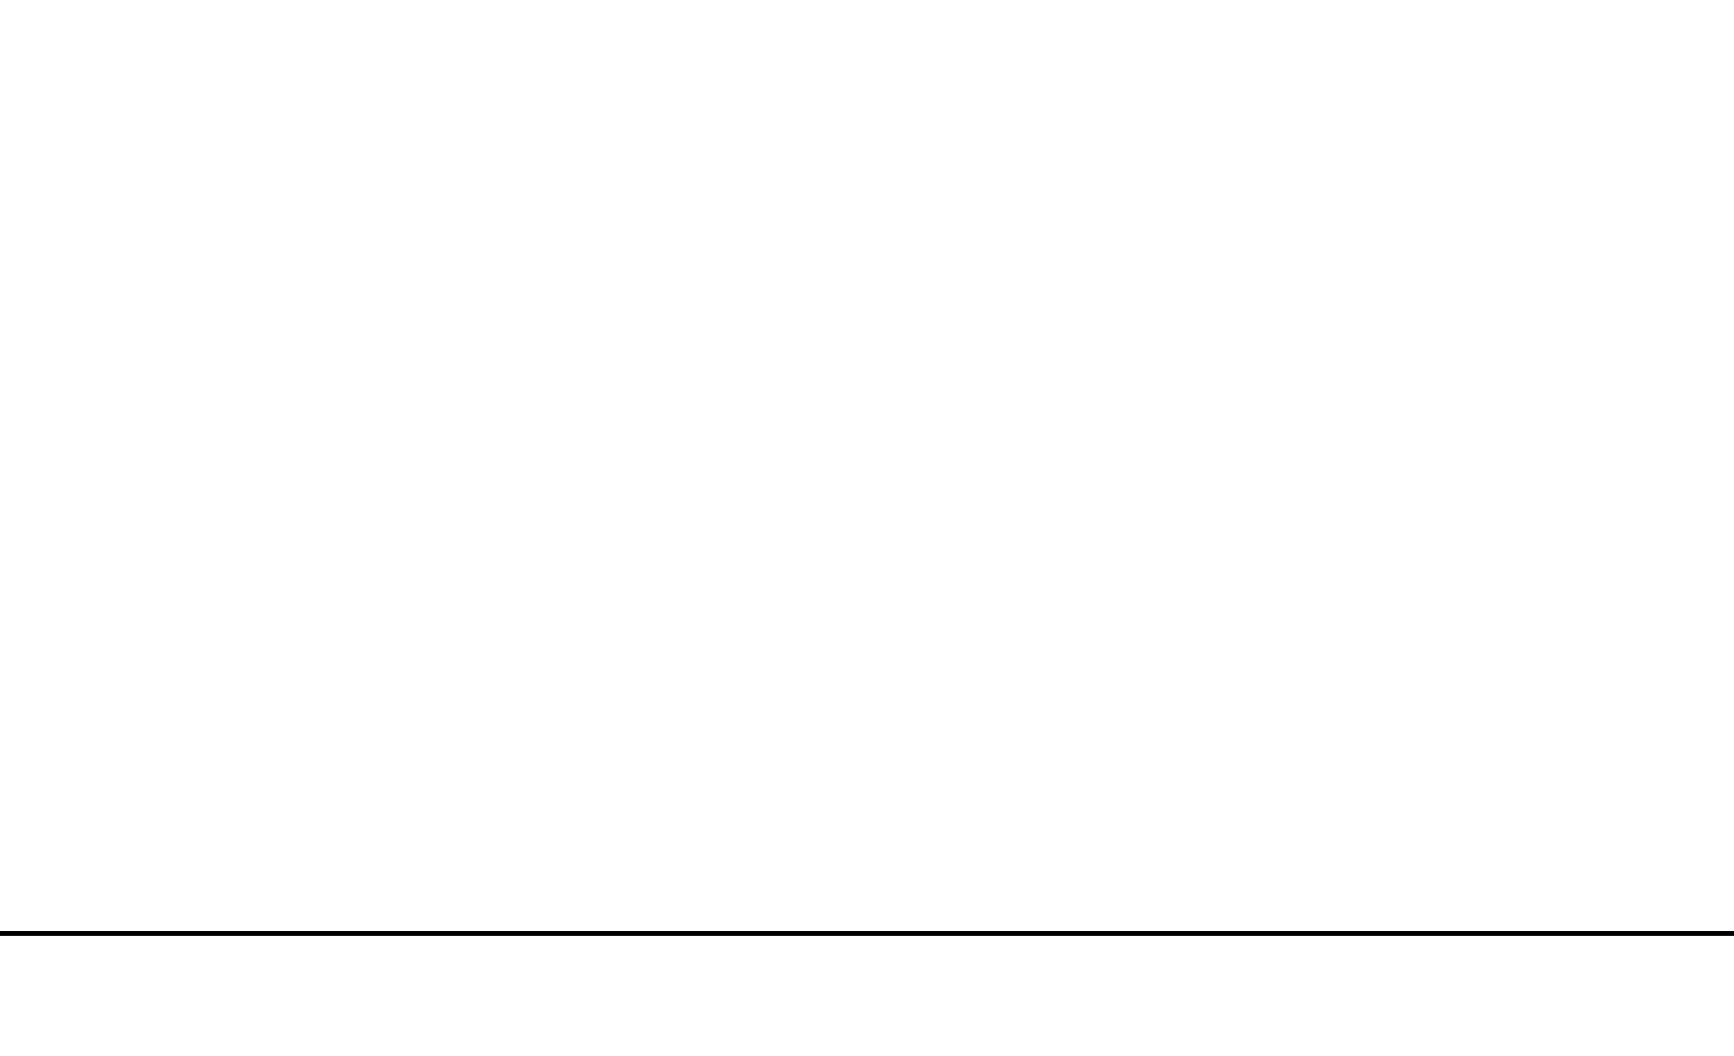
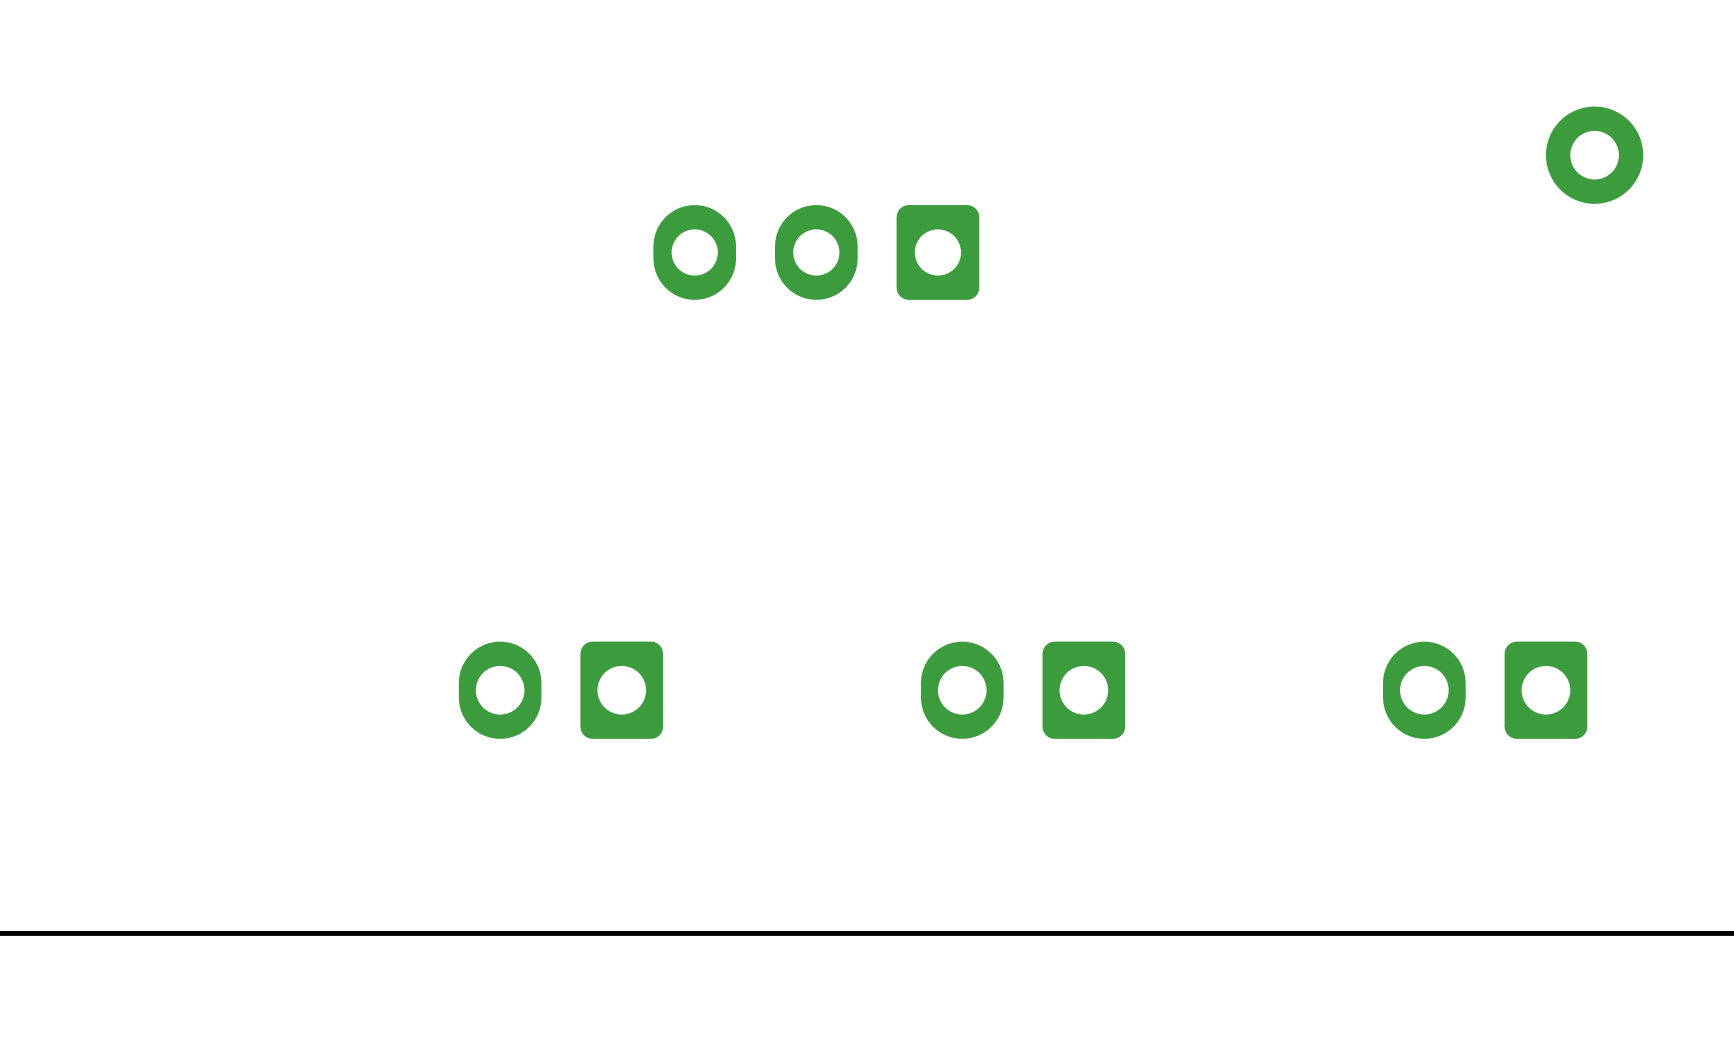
part: none -> (1594, 155)
part: none -> (816, 252)
part: none -> (560, 690)
part: none -> (1023, 690)
part: none -> (1485, 690)

